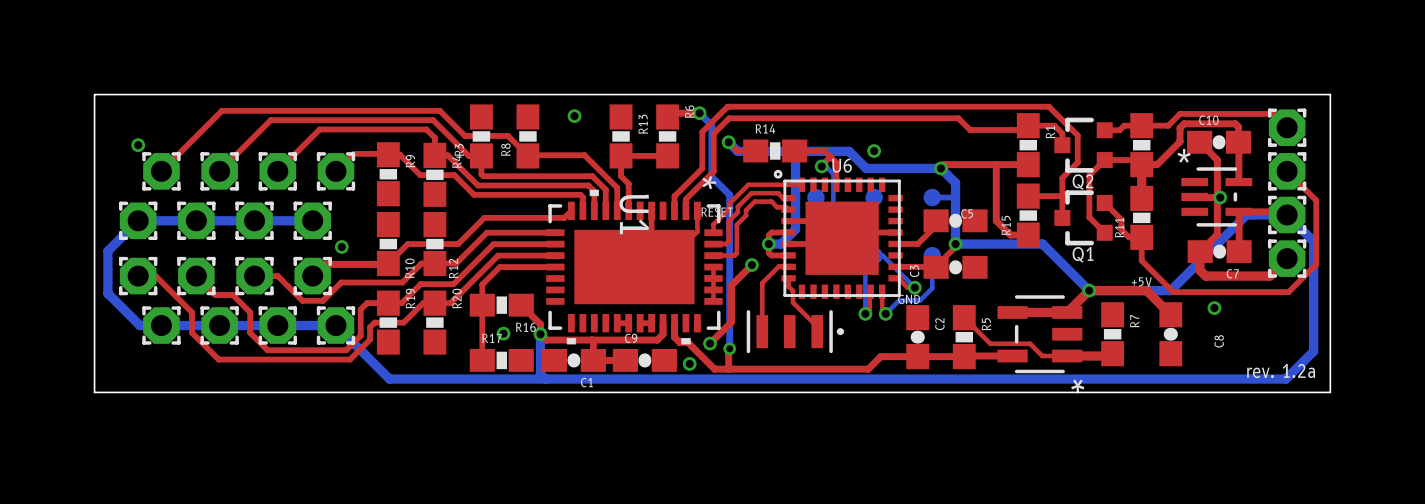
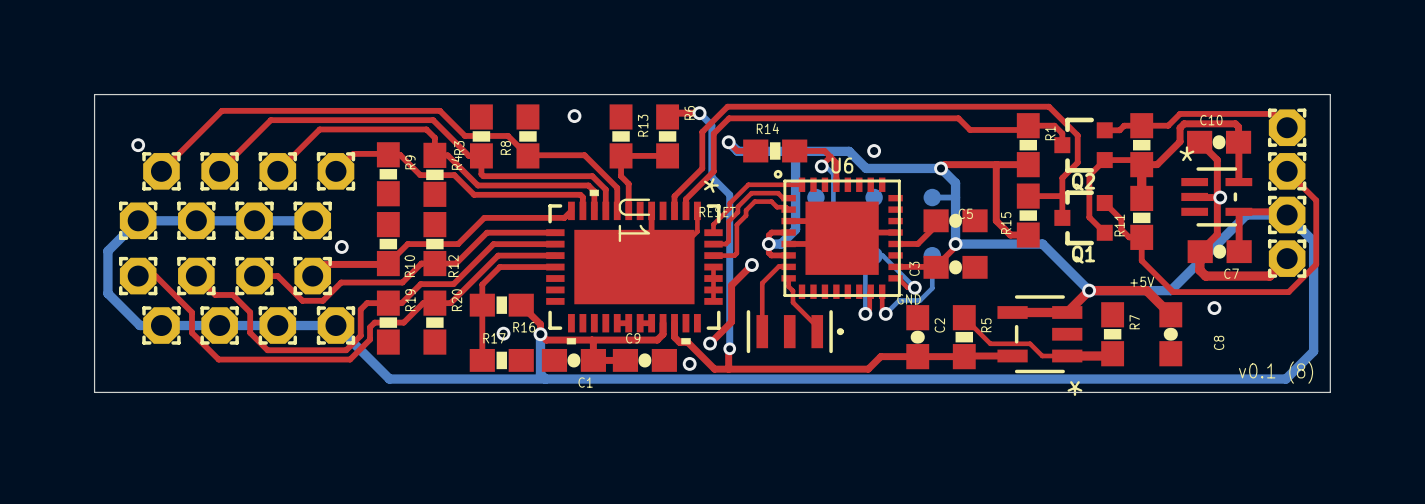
text: rev. 1.2a (1281, 370) -> v0.1 (8) (1276, 372)

